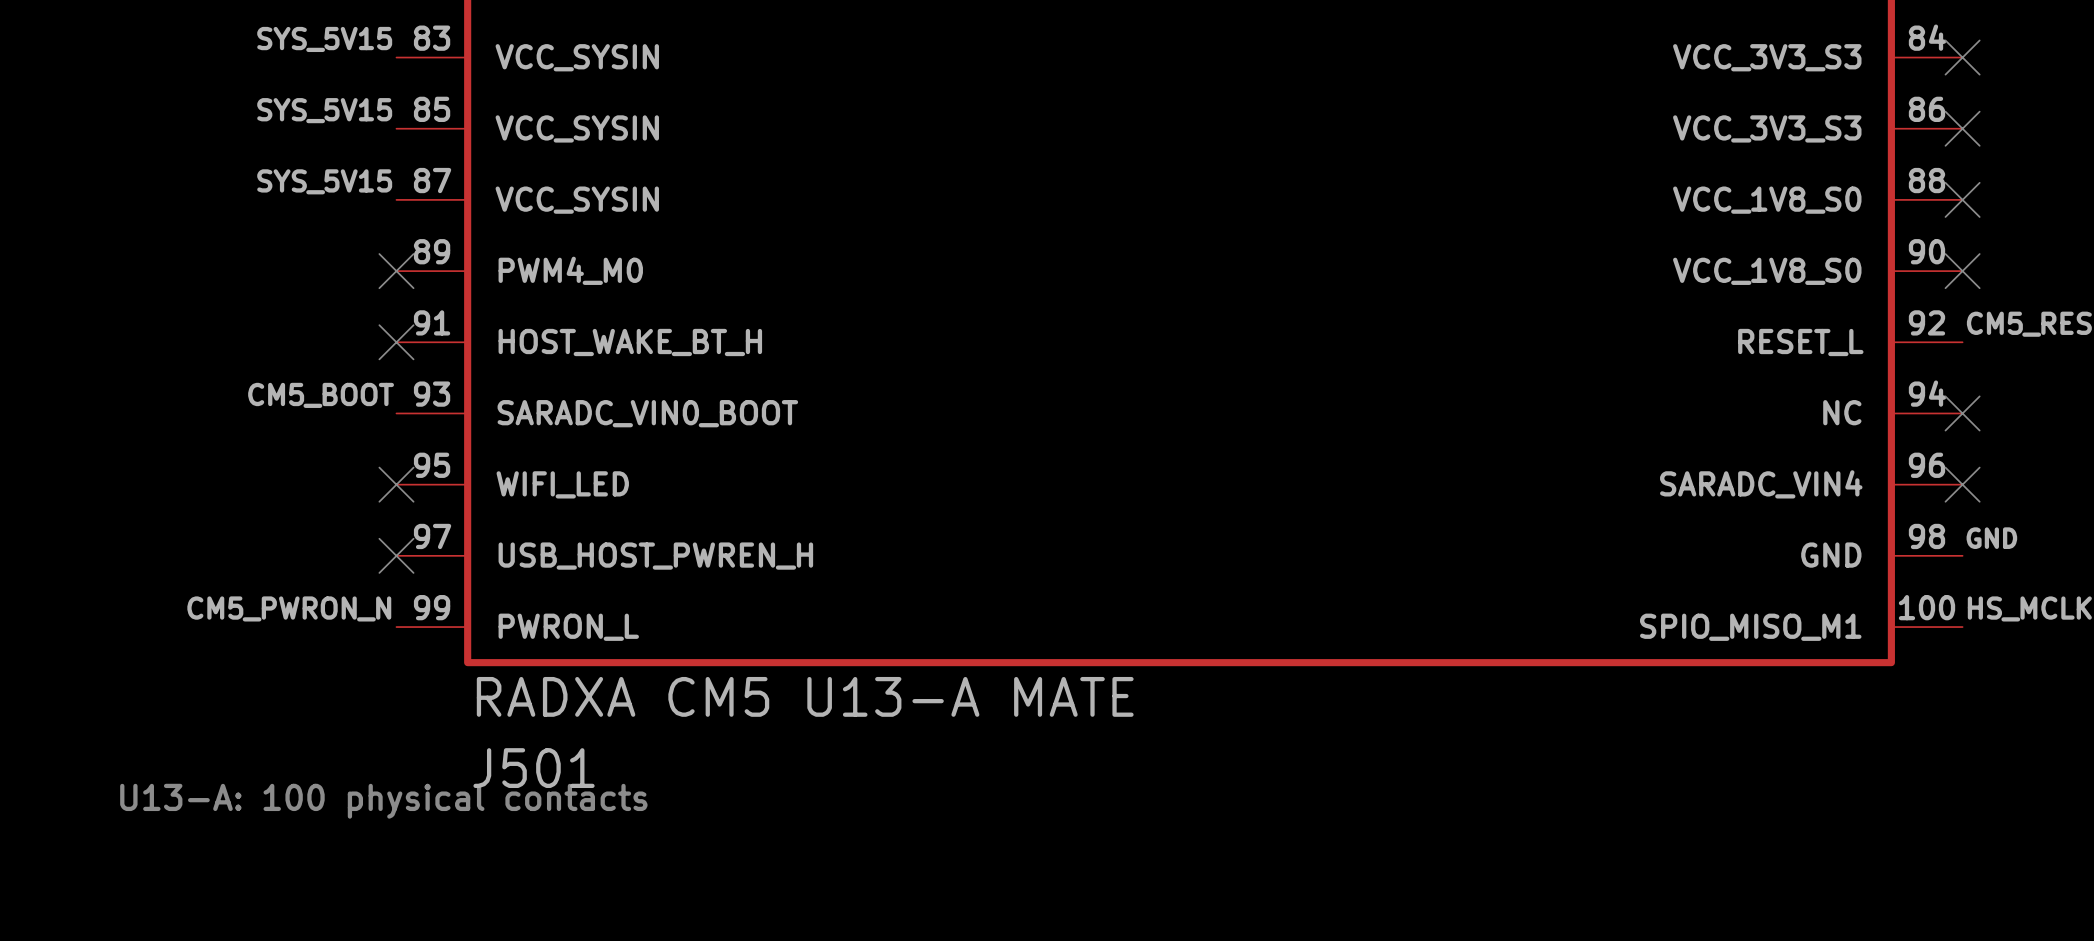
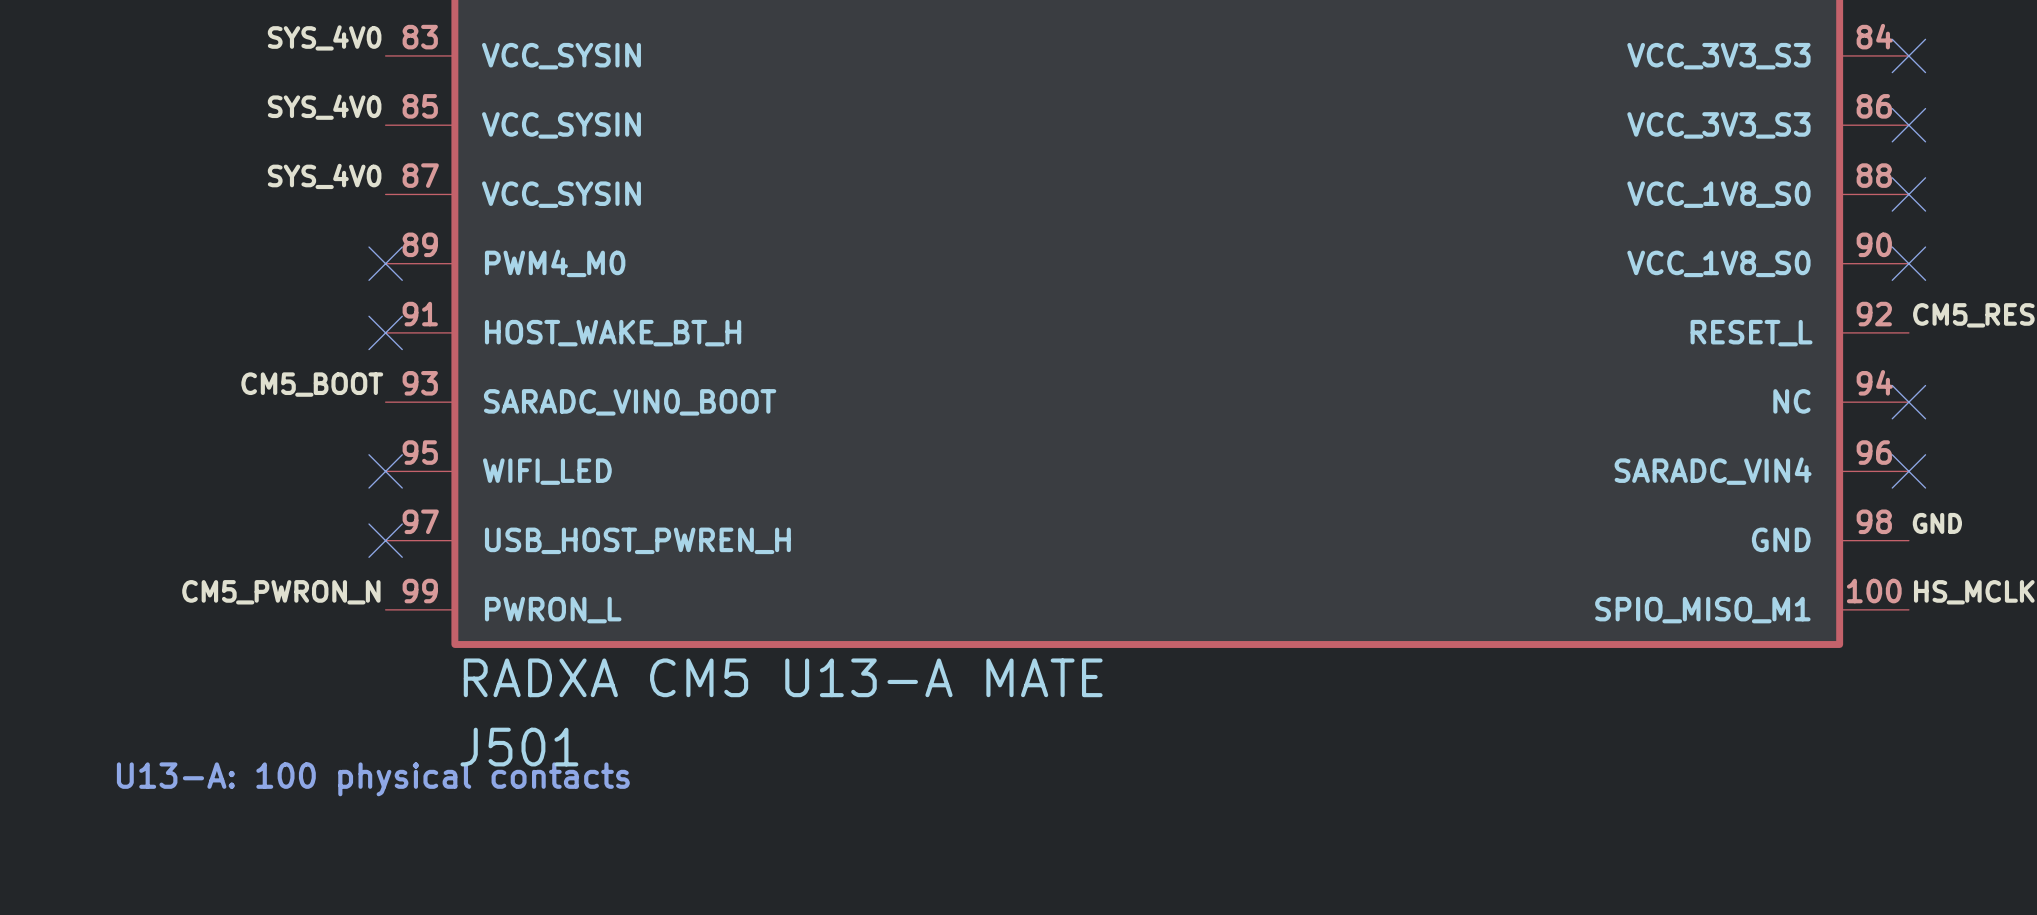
label: SYS_5V15 (324, 39) -> SYS_4V0 (324, 37)
label: SYS_5V15 (324, 110) -> SYS_4V0 (324, 107)
label: SYS_5V15 (324, 181) -> SYS_4V0 (324, 176)

